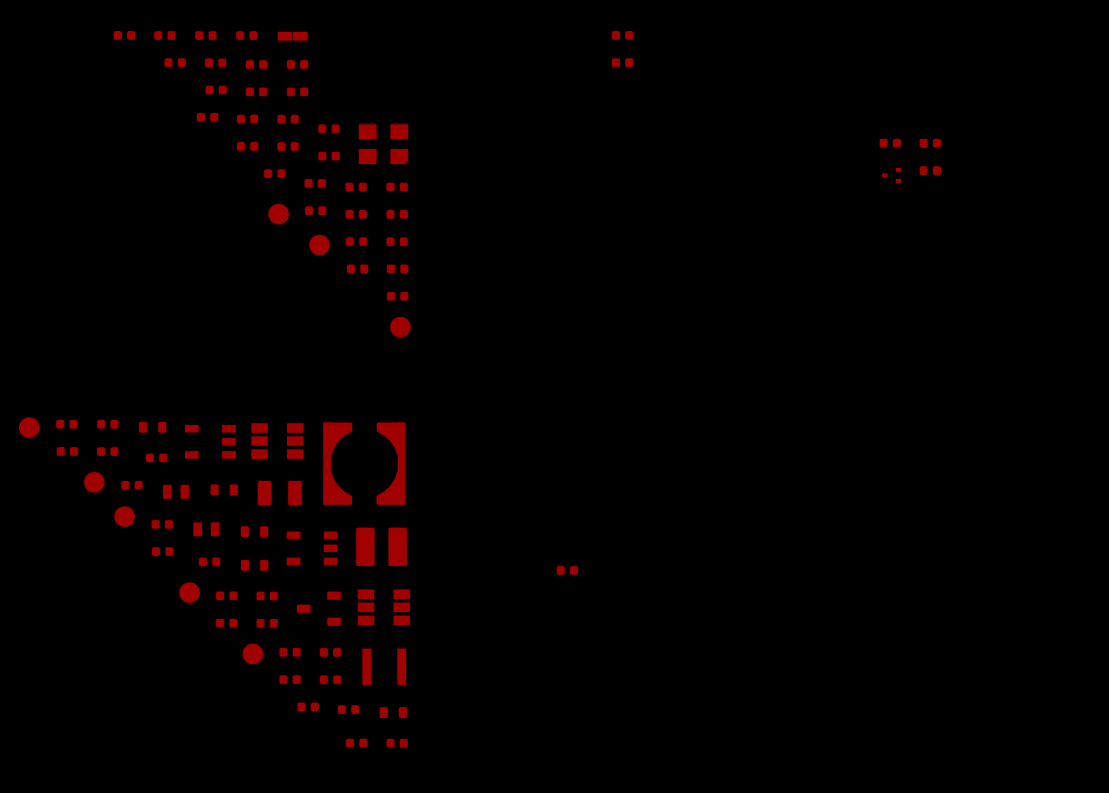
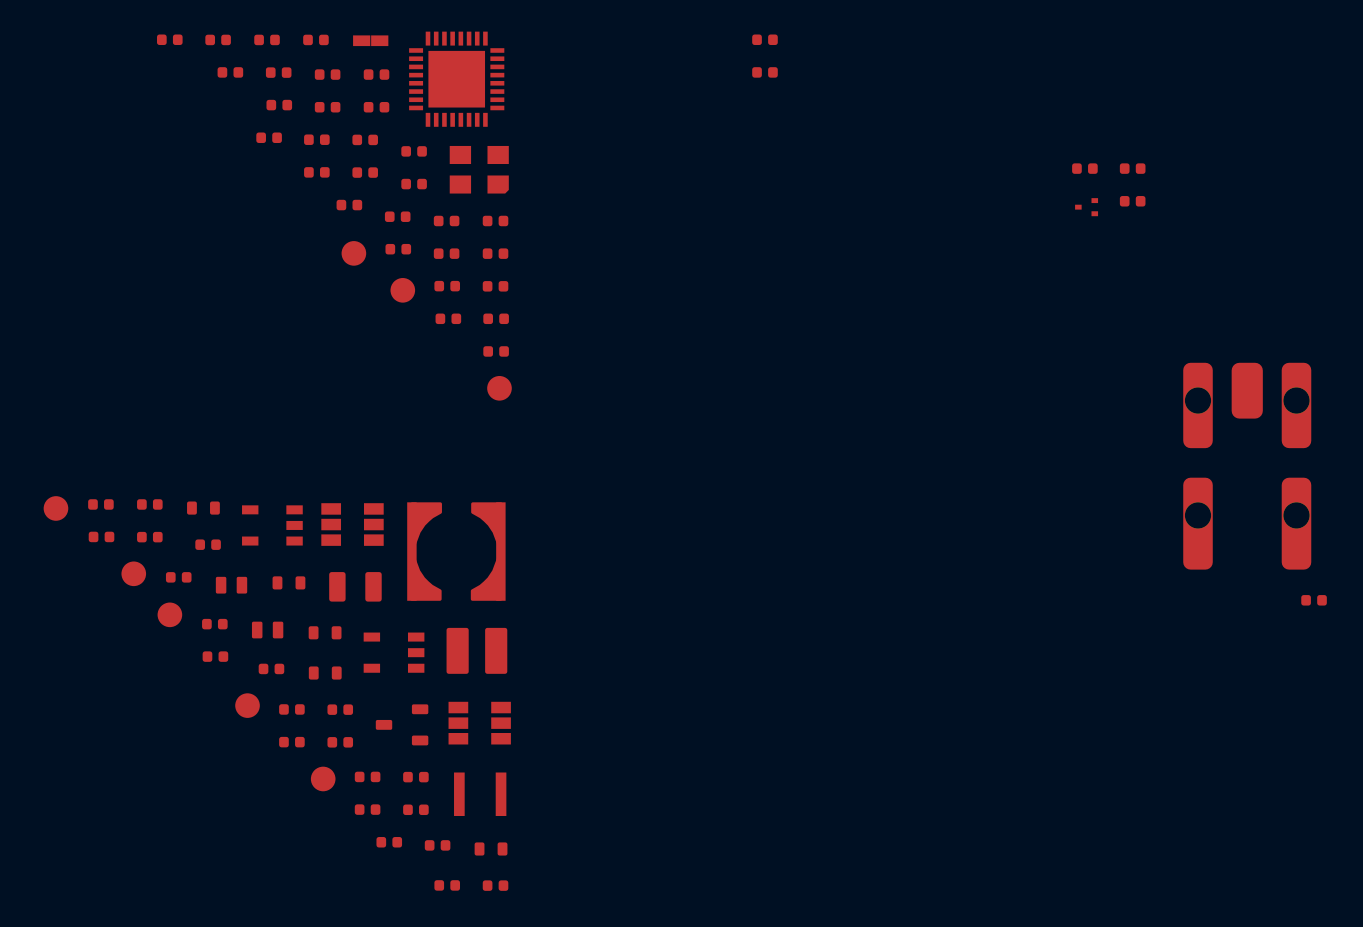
part: none -> (456, 79)
part: none -> (1247, 466)
part: none -> (1314, 600)
part: (567, 570) -> none

